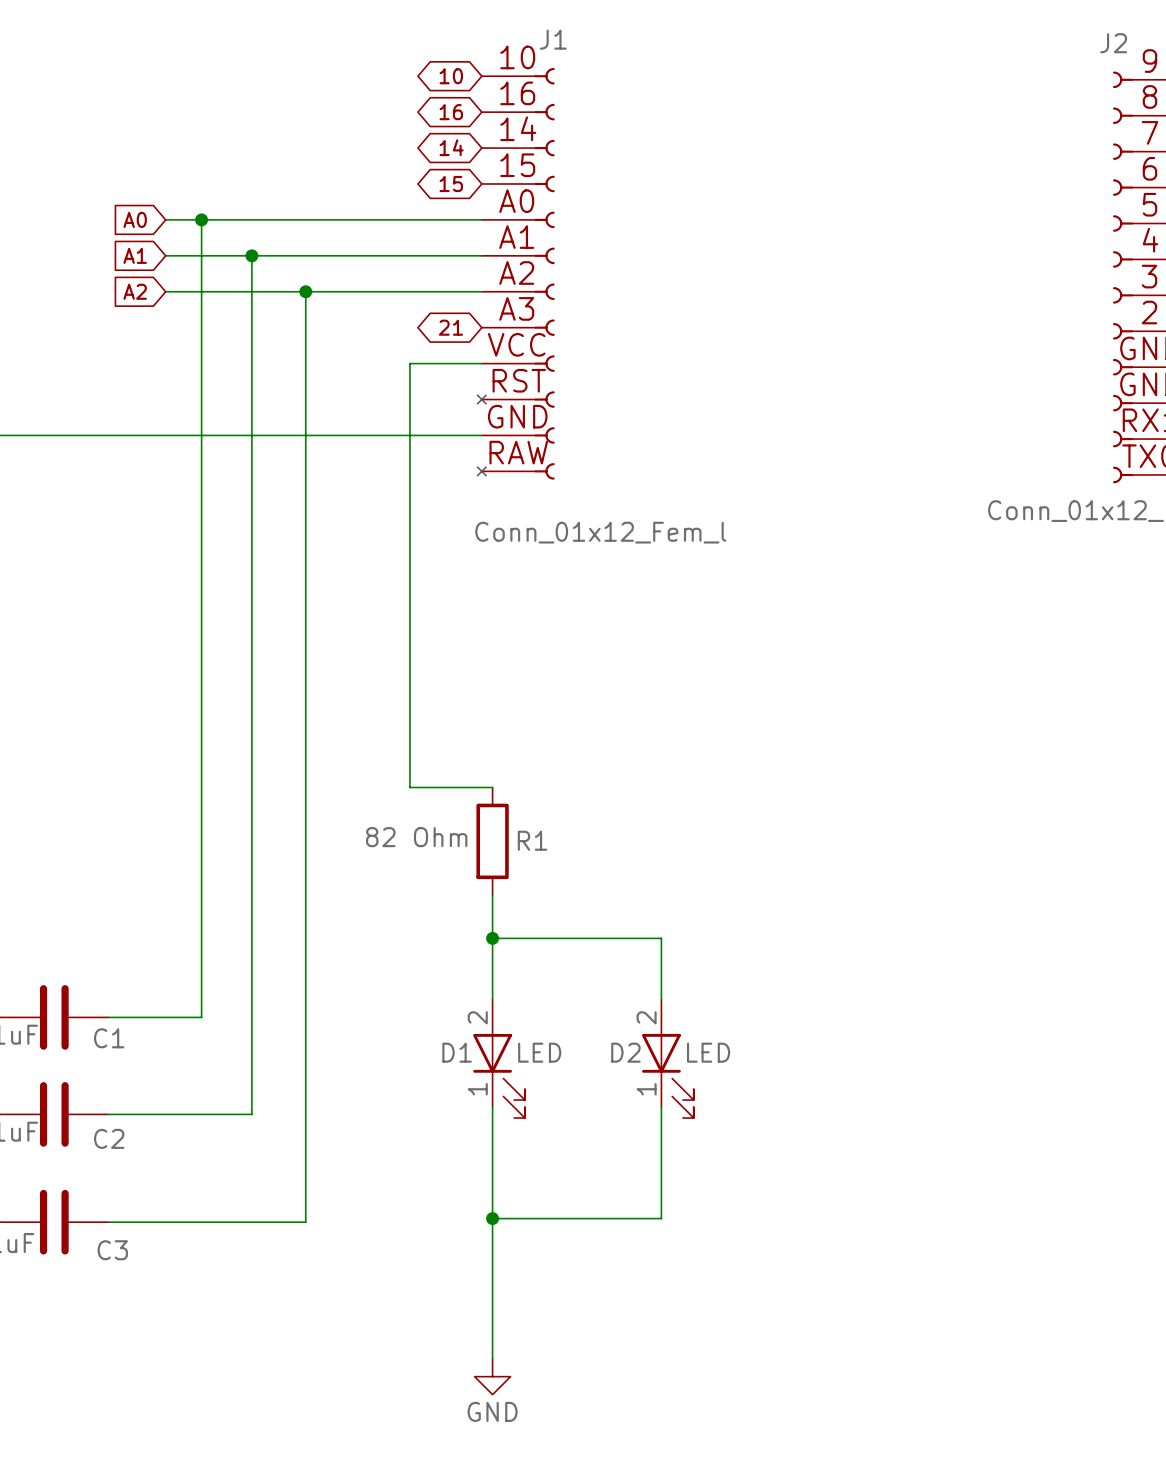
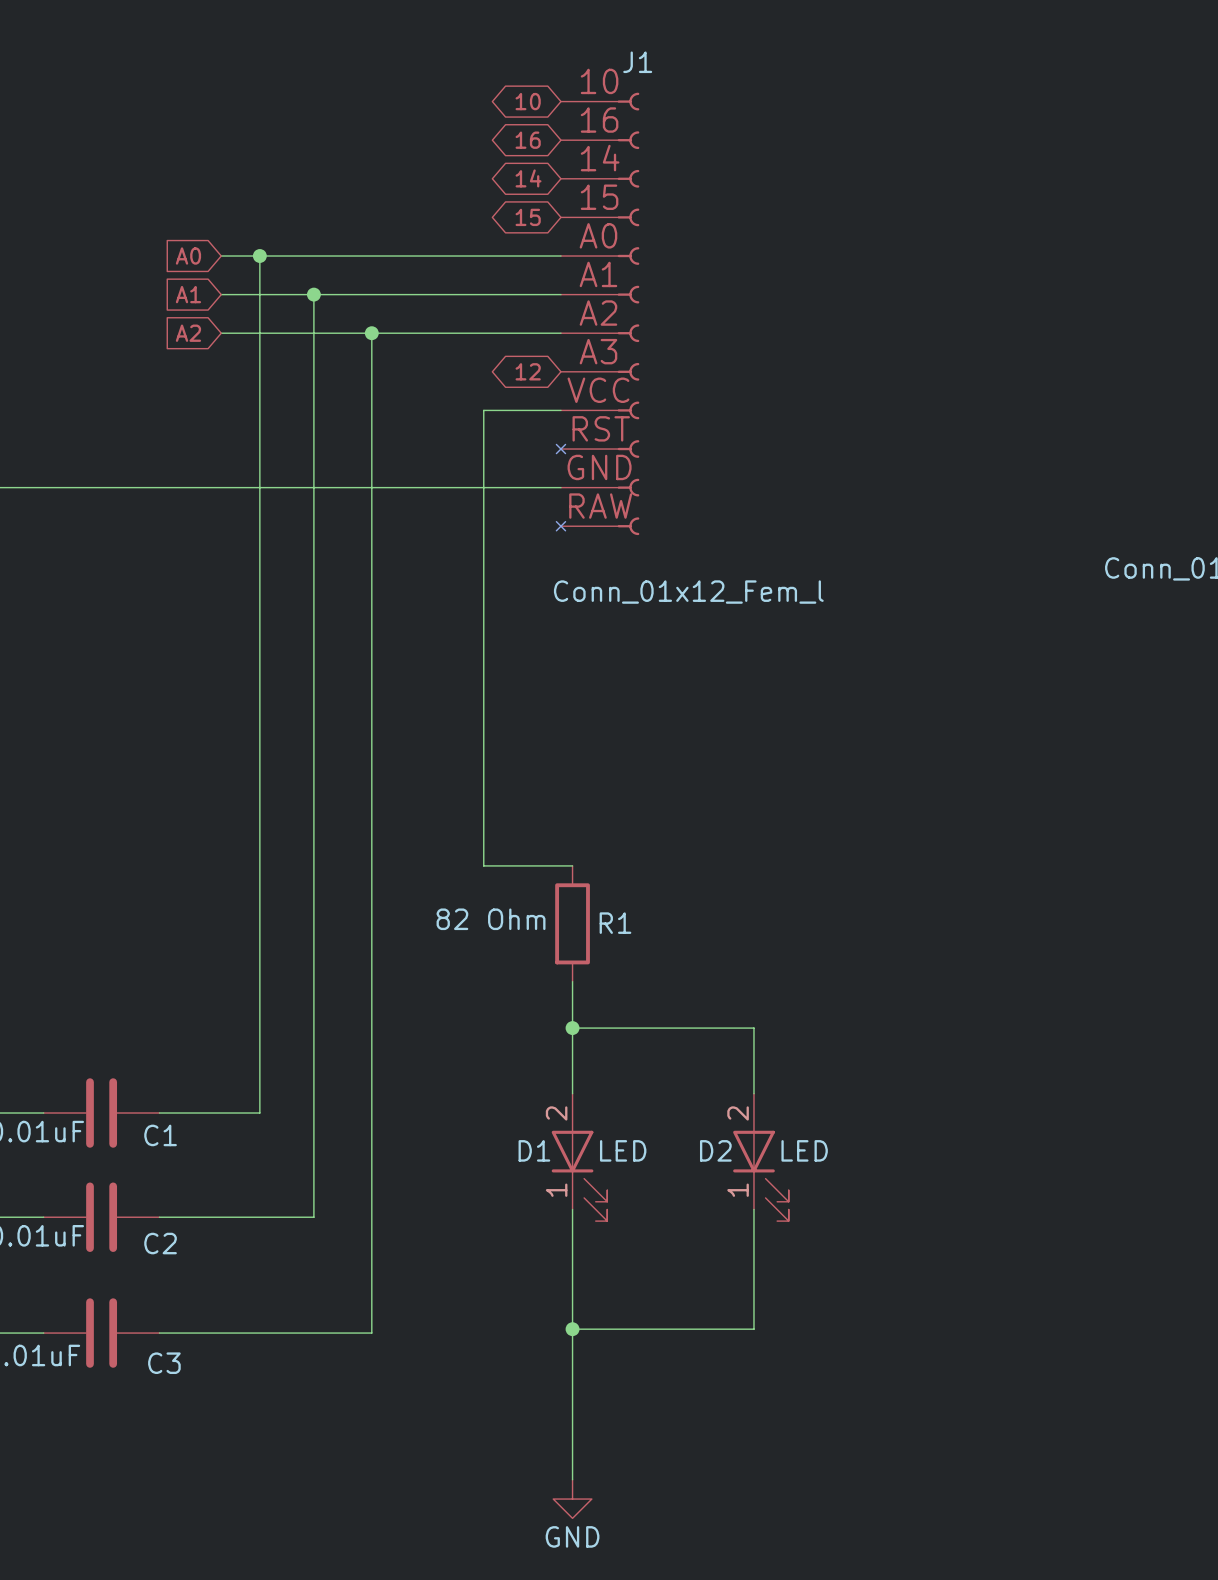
global label: 21 (450, 327) -> 12 (528, 371)

